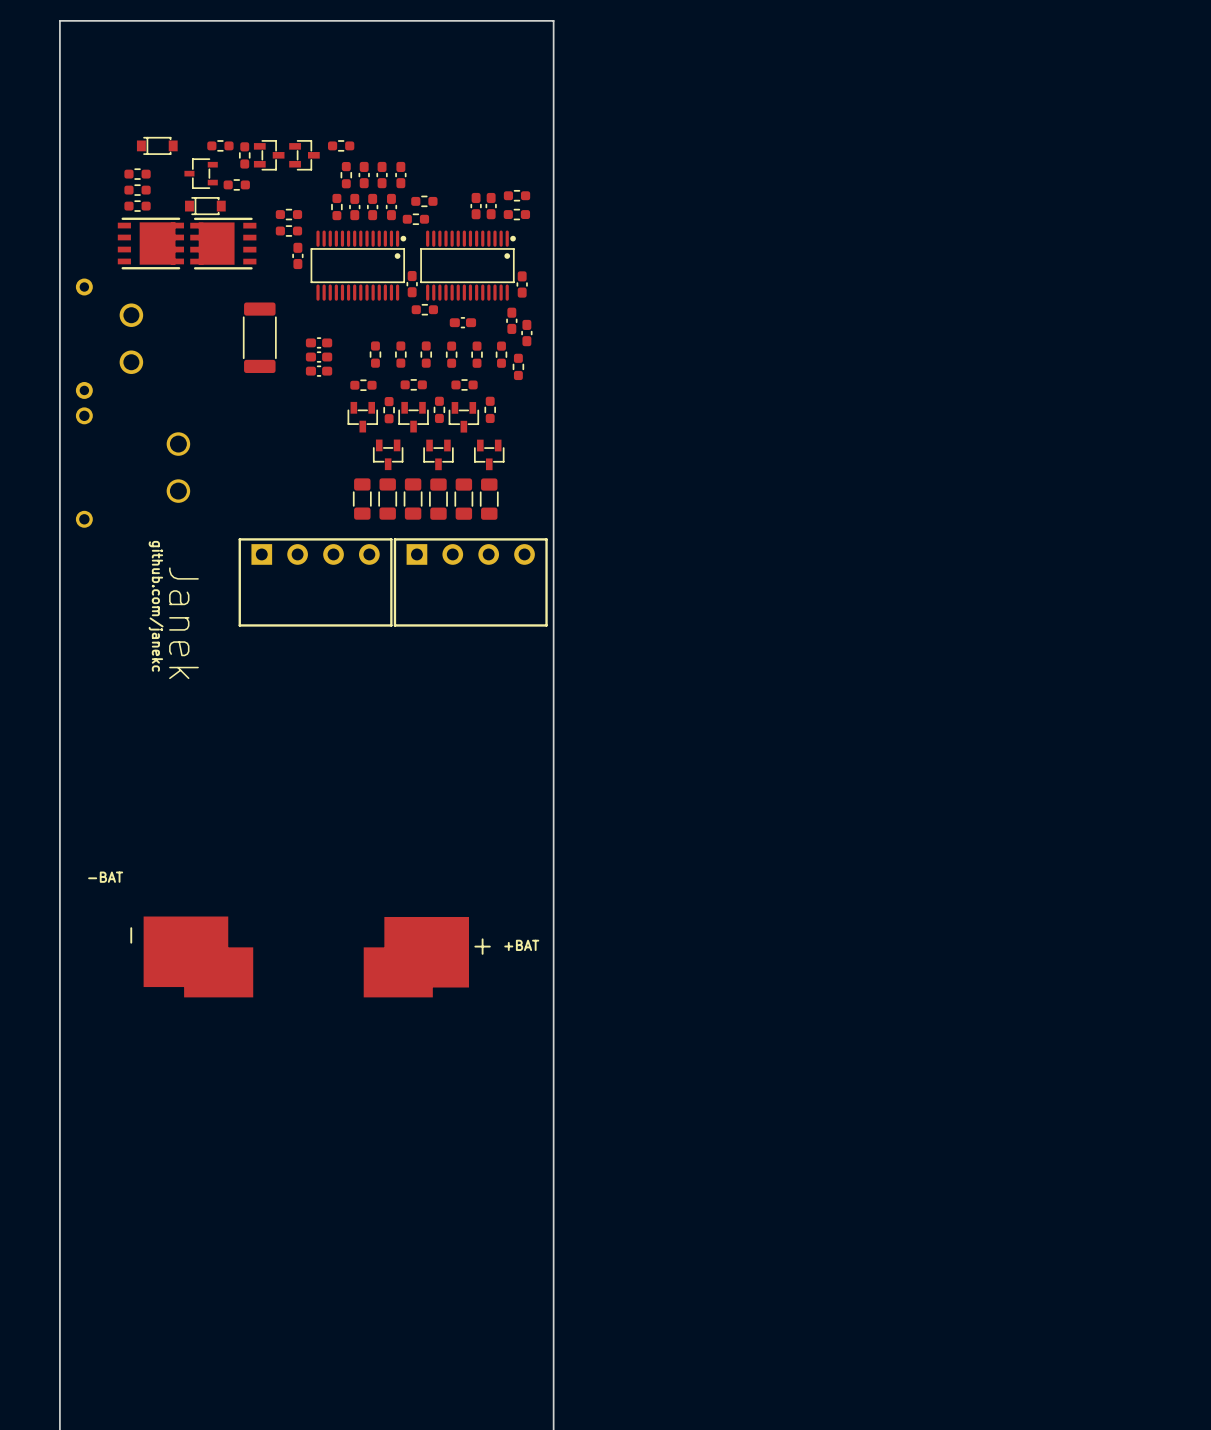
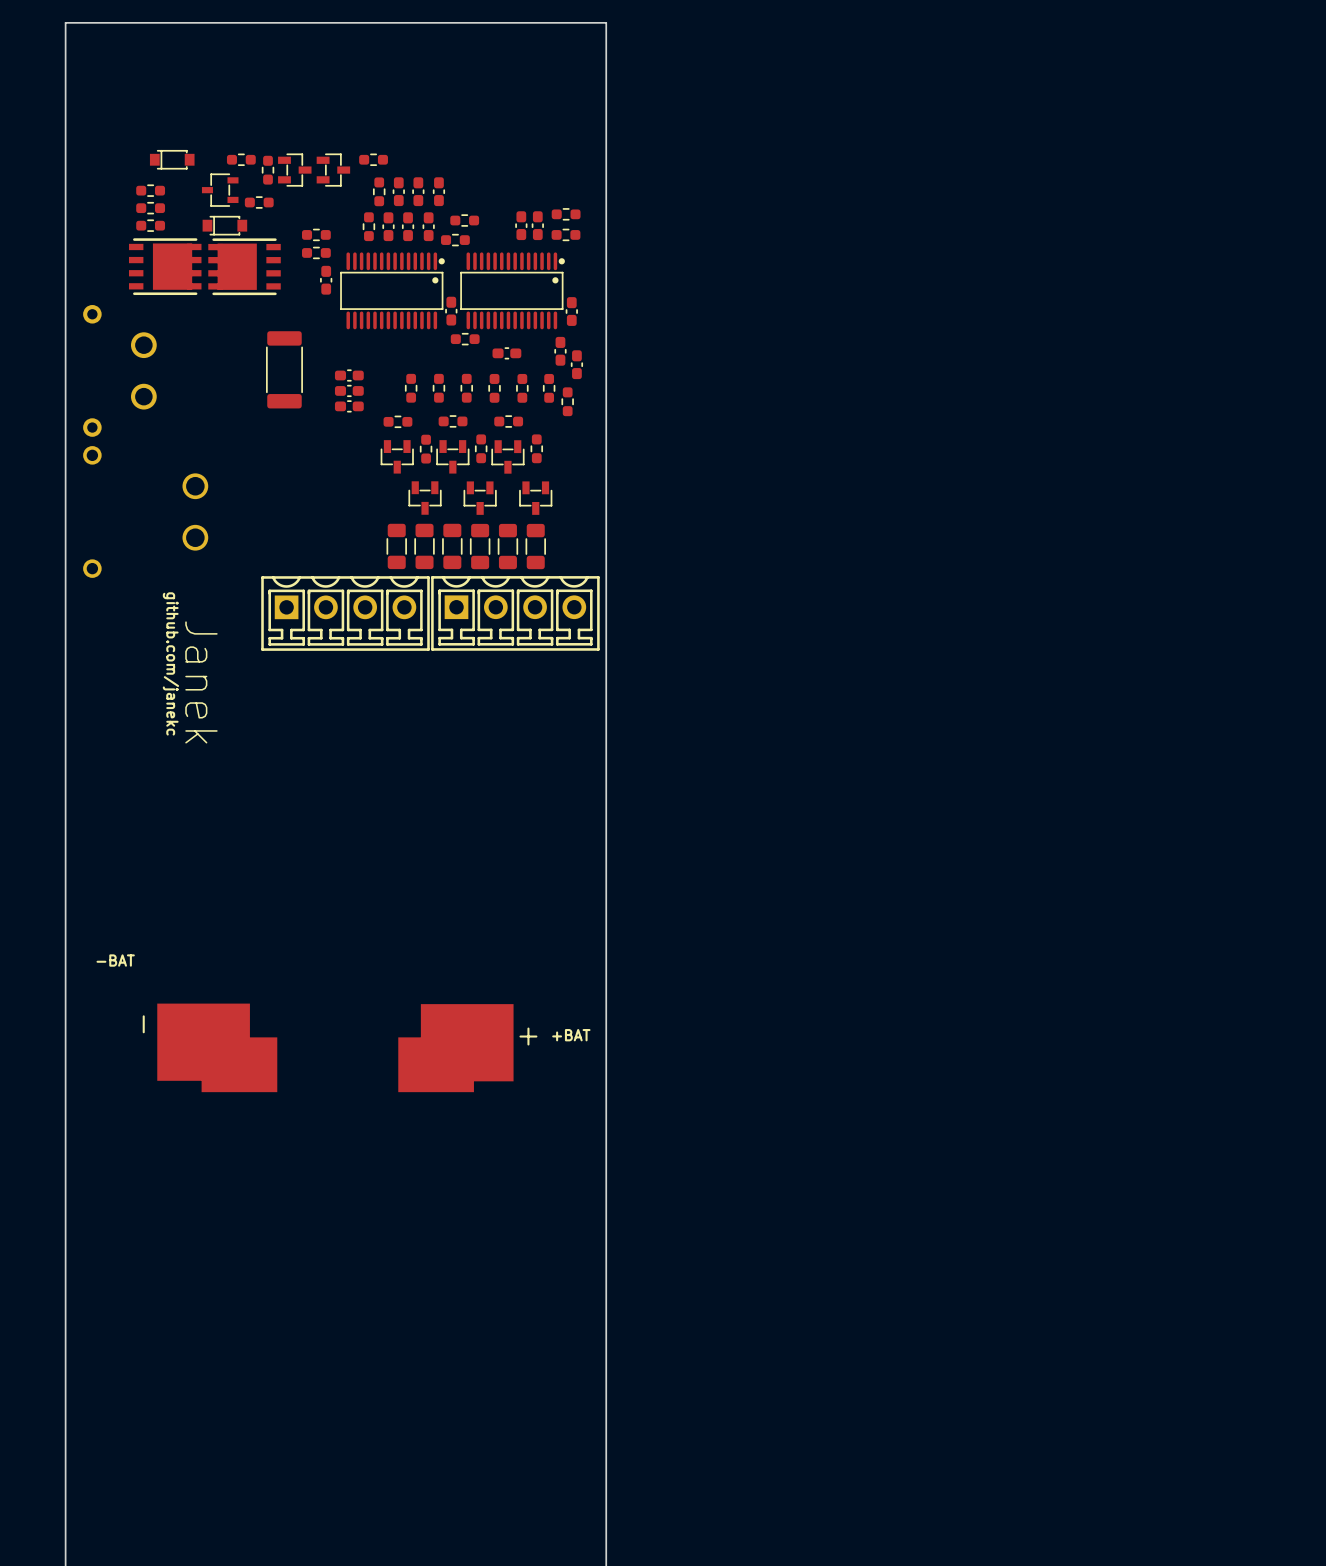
part: none -> (345, 613)
part: none -> (515, 613)
part: (315, 582) -> none
part: (470, 582) -> none

